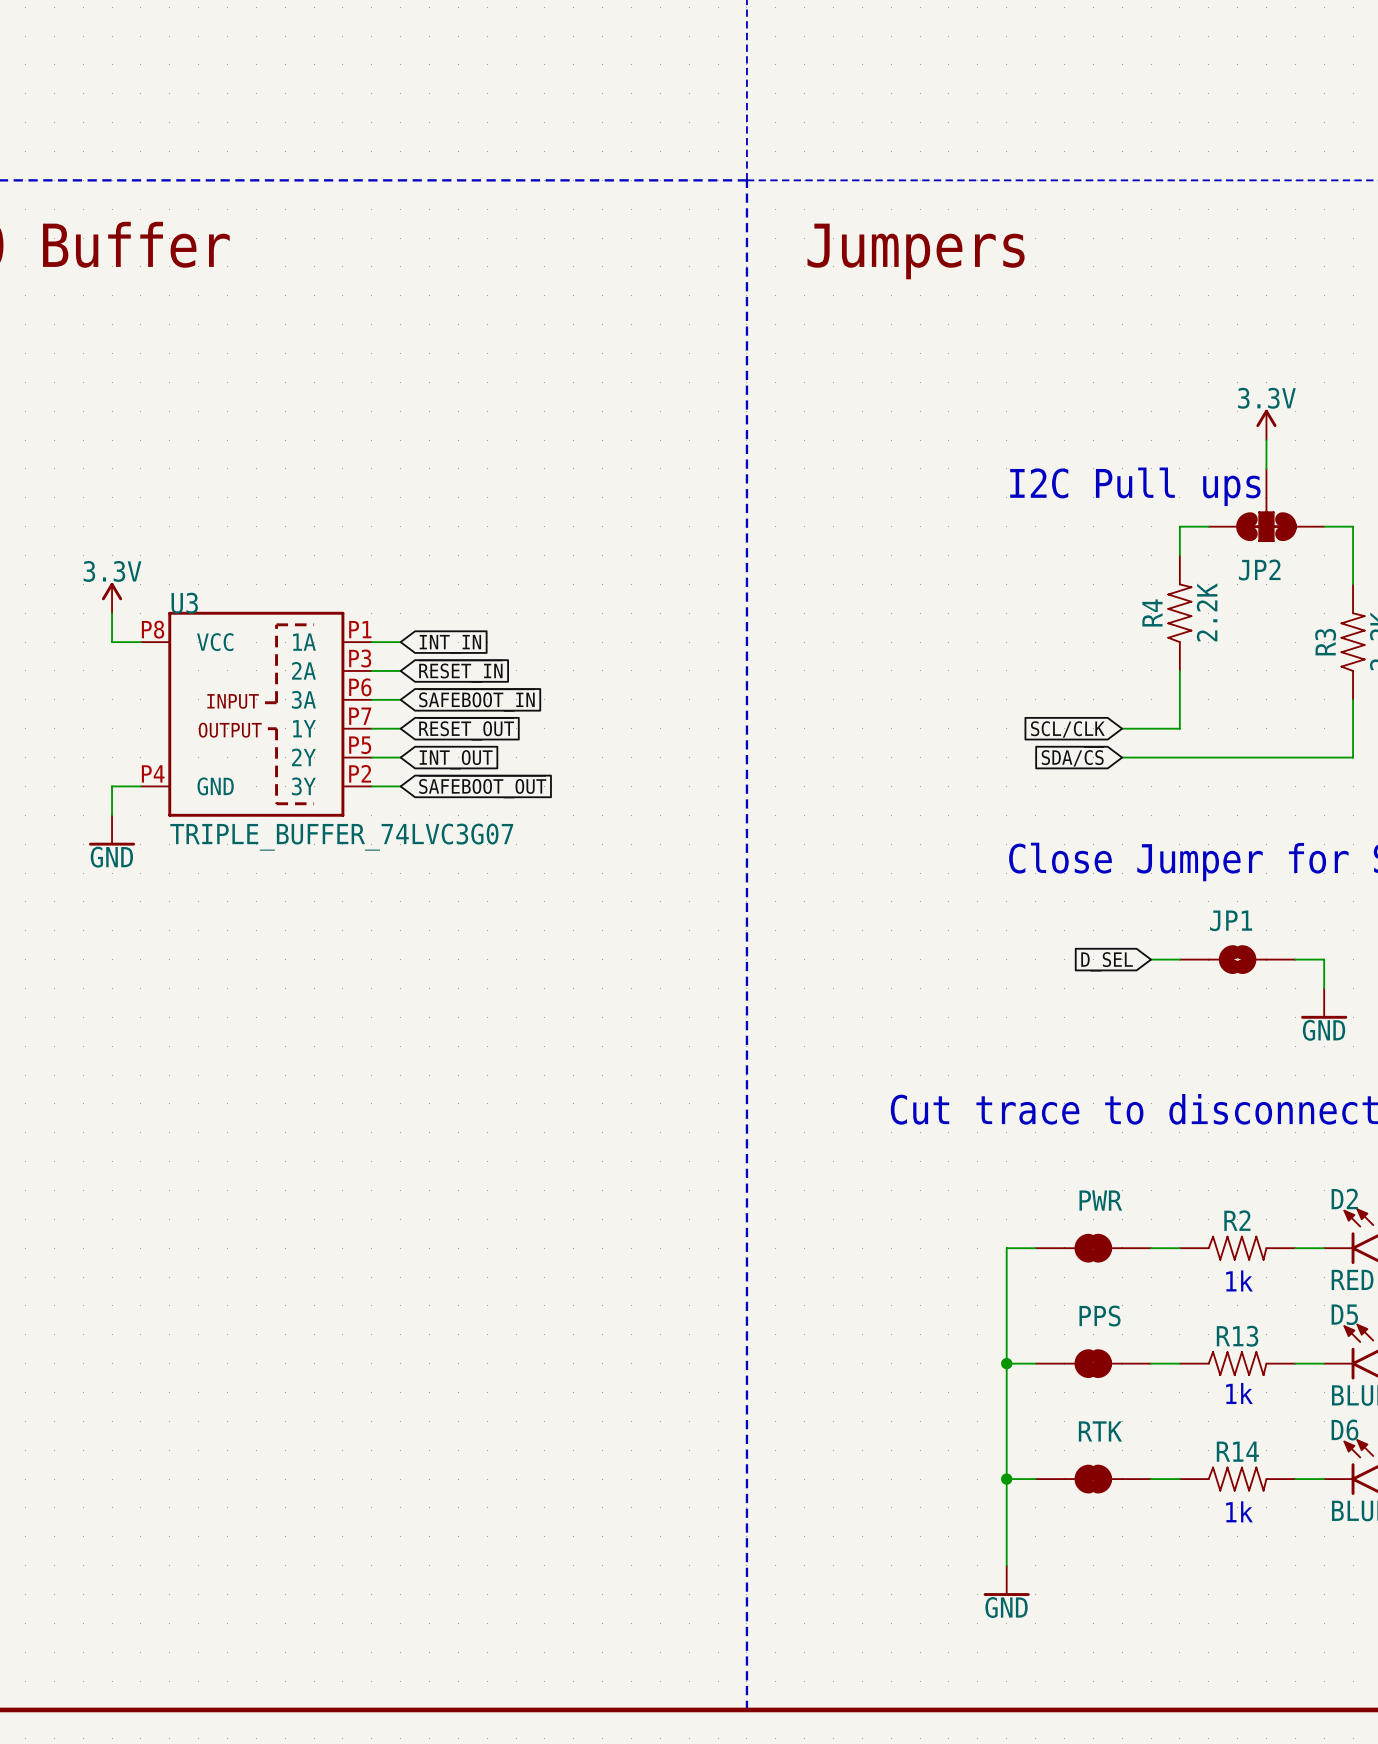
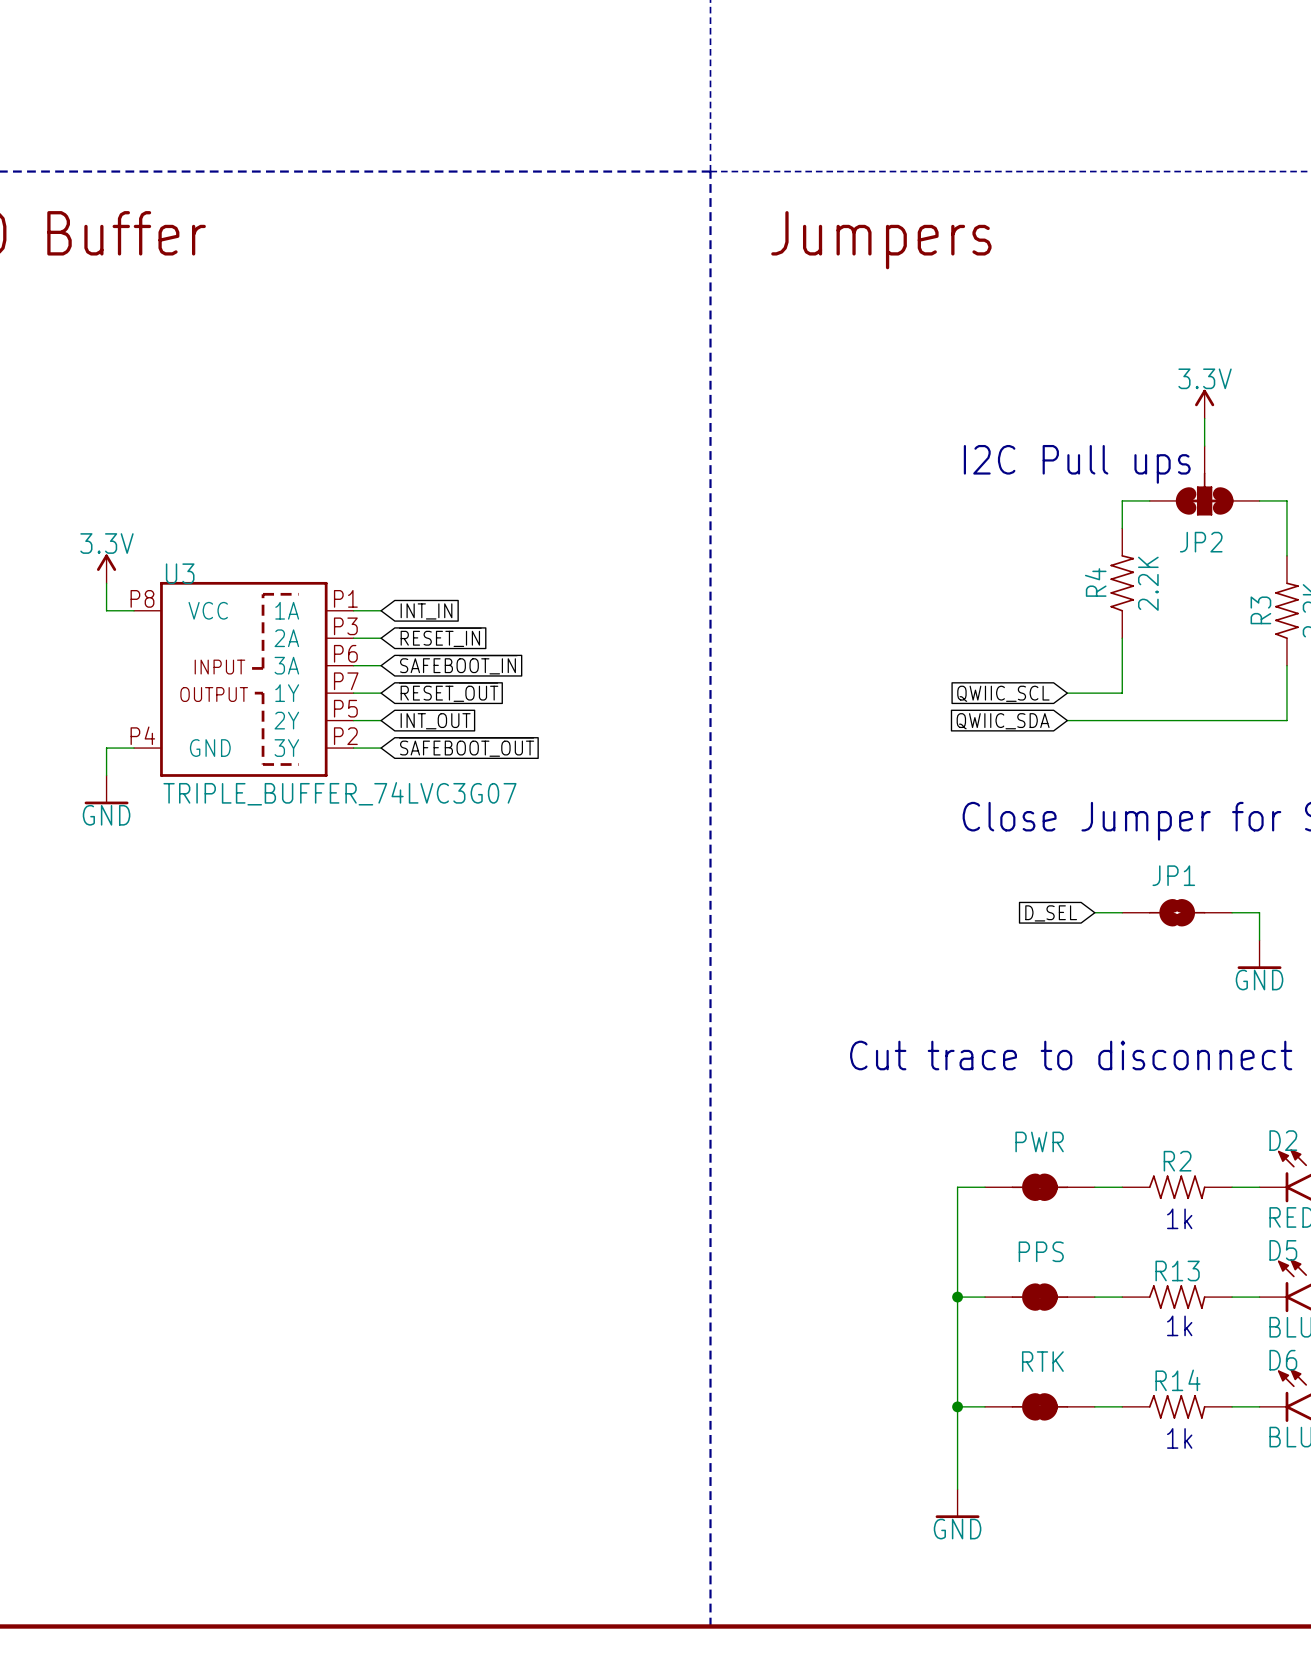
global label: SCL/CLK (1067, 729) -> QWIIC_SCL (1003, 693)
global label: SDA/~{CS} (1072, 756) -> QWIIC_SDA (1003, 721)

